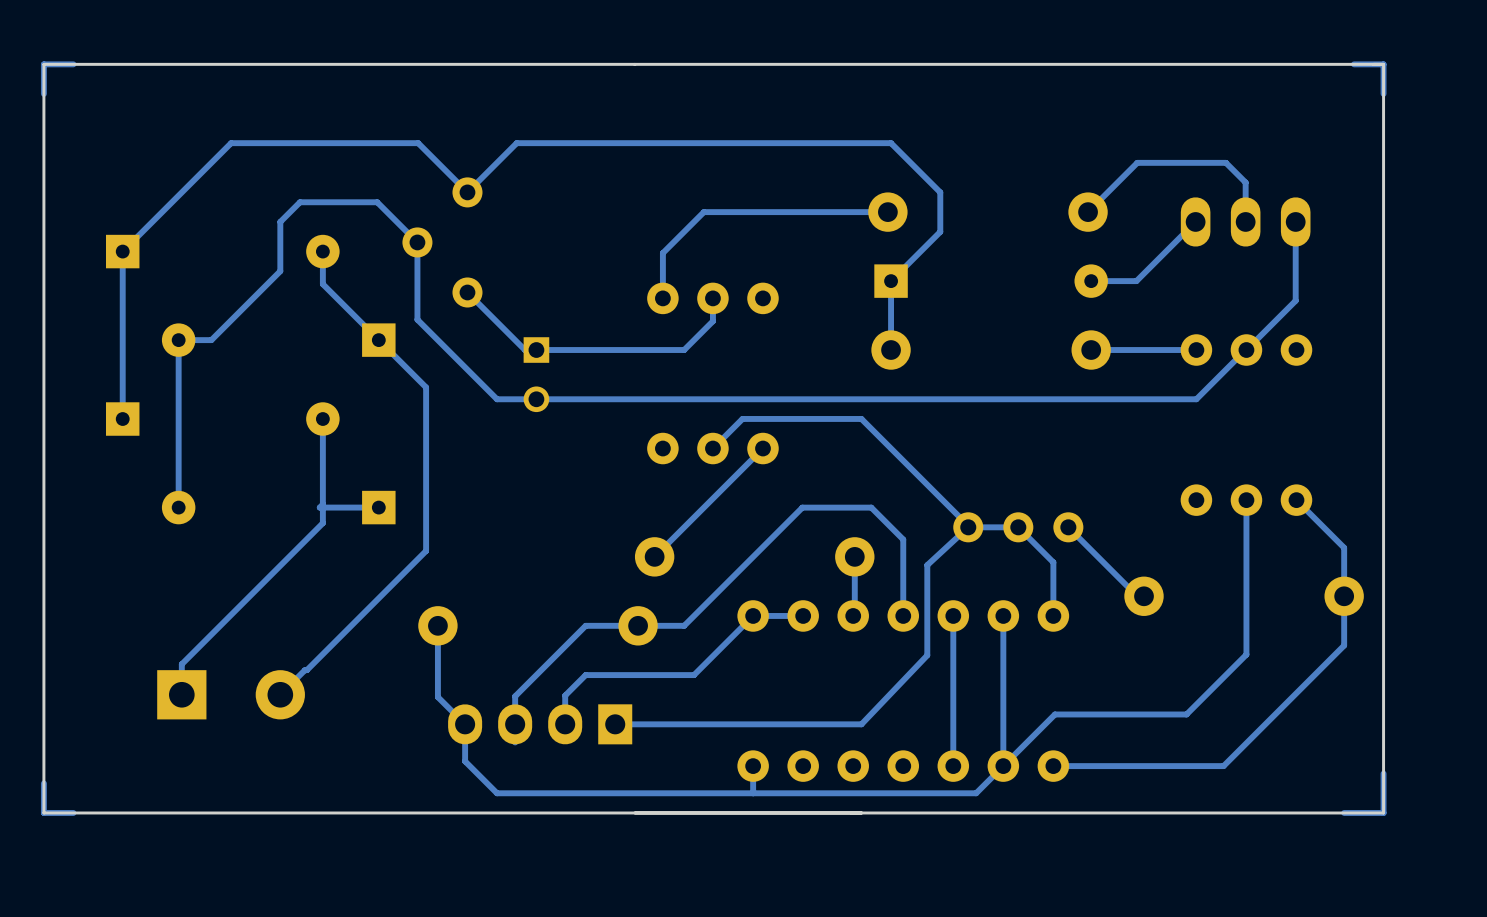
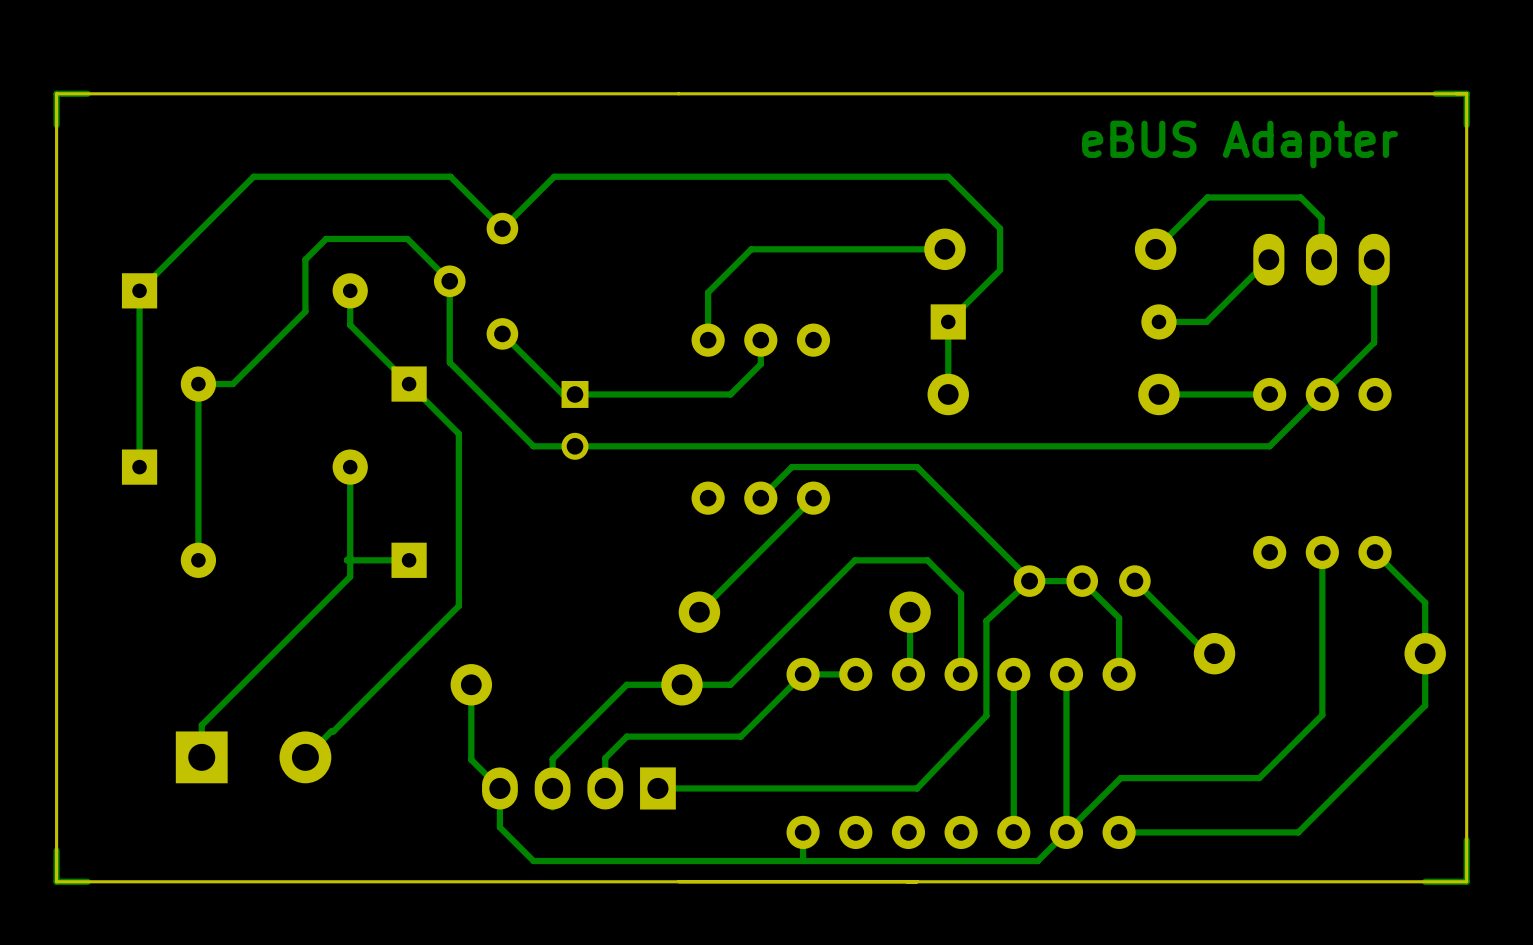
text: none -> eBUS Adapter (1240, 144)

